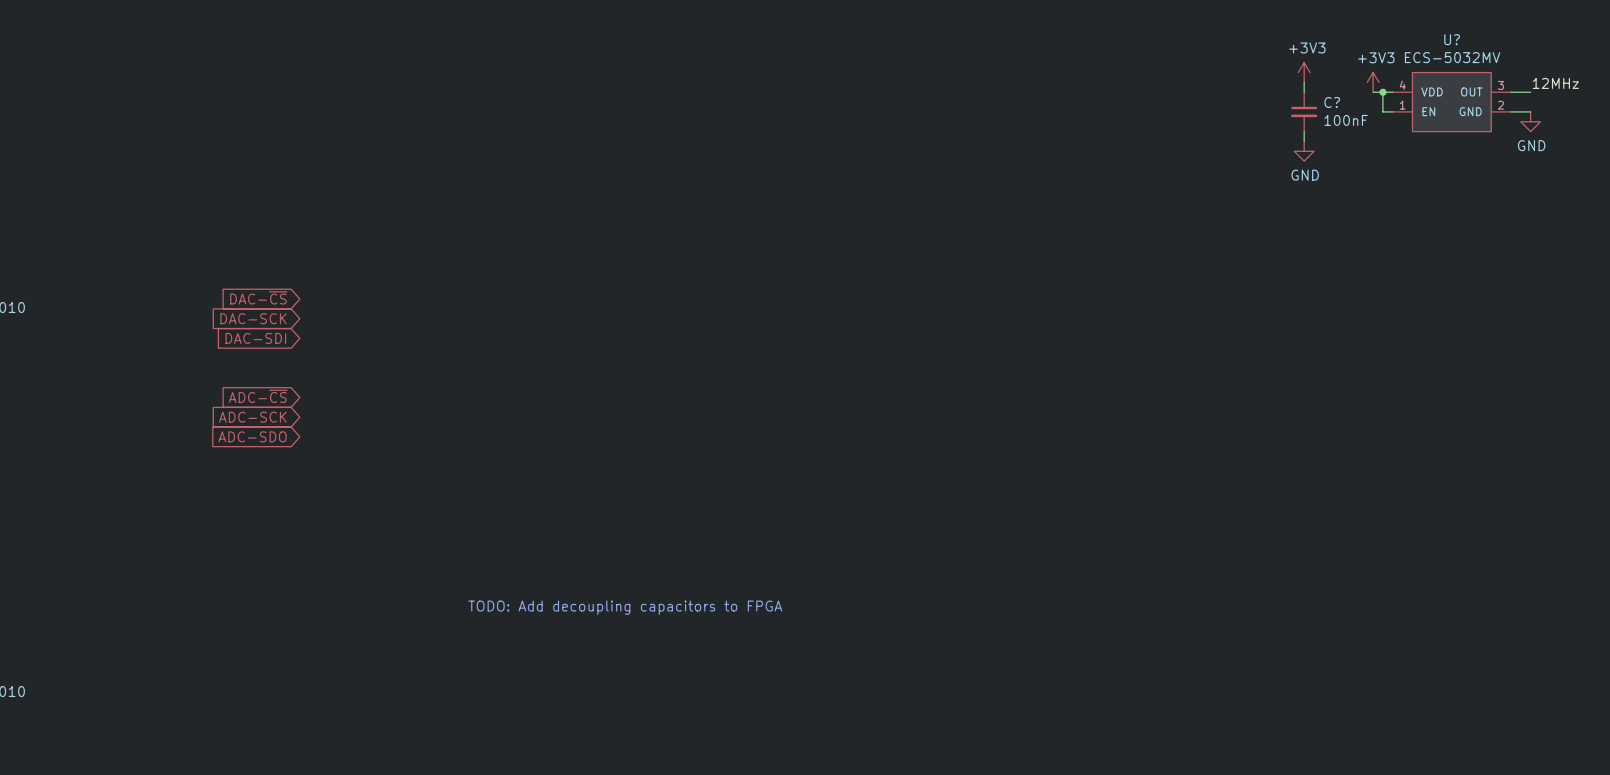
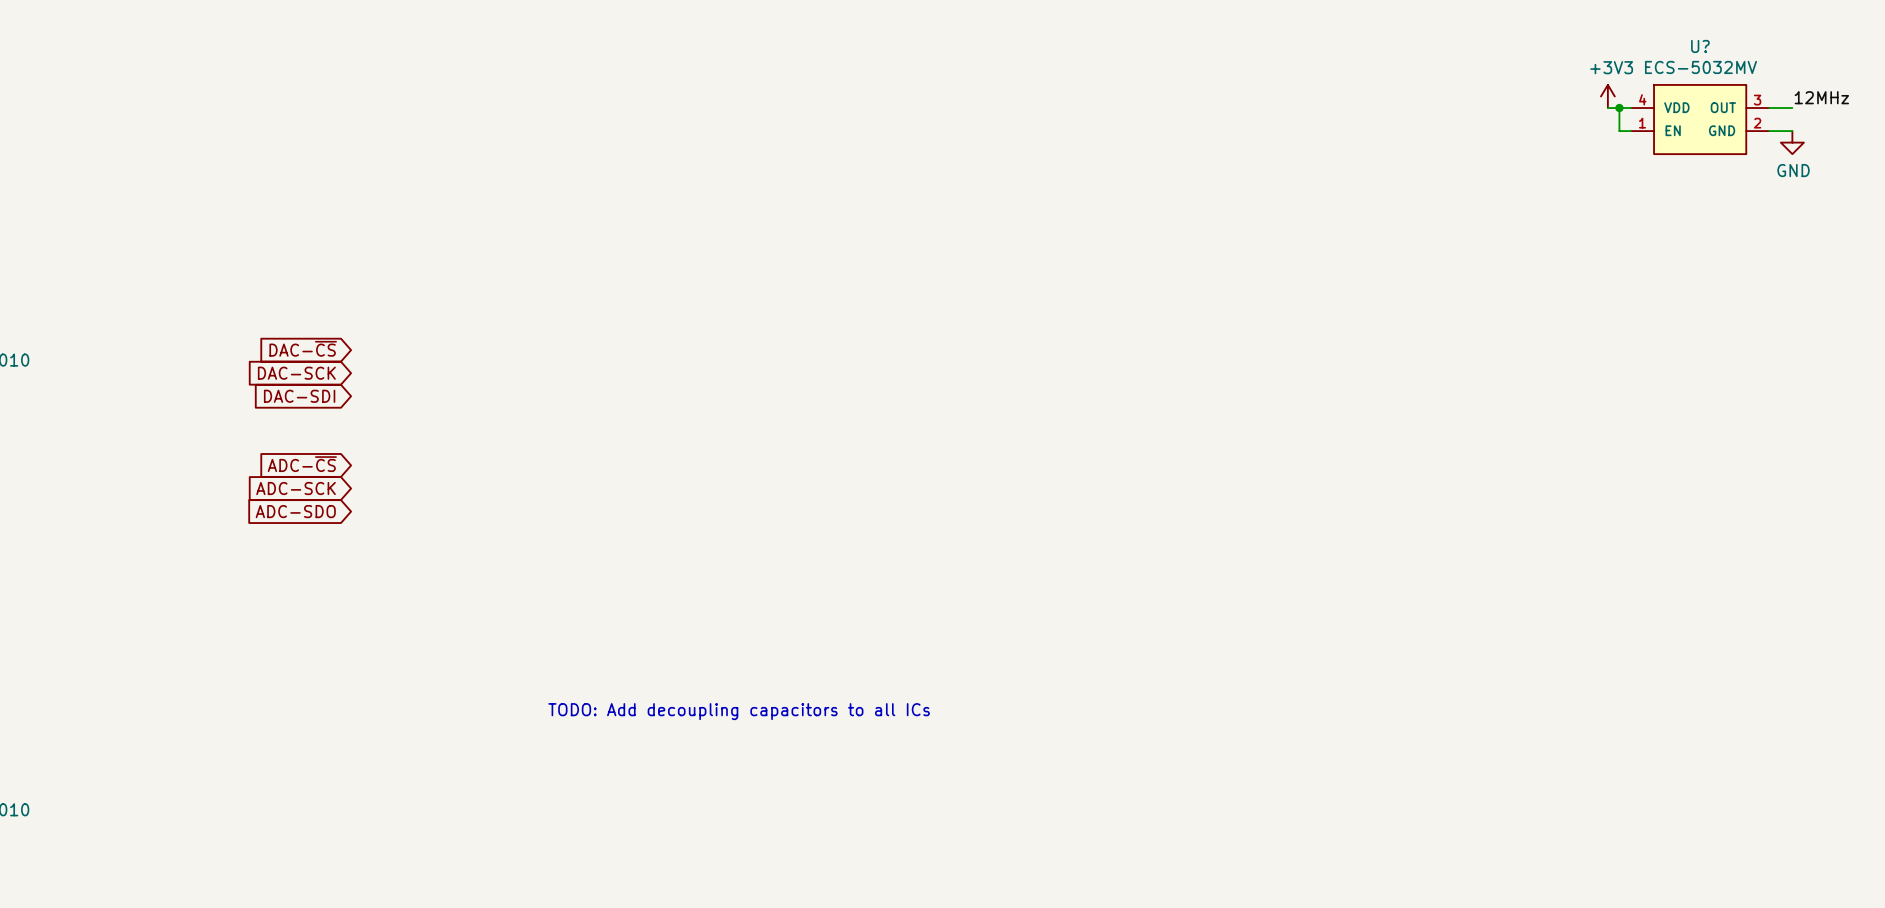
power symbol: +3V3 (1304, 72) -> none
wire: (1304, 82) (1304, 92) -> none
C?: 100nF (1304, 111) -> none
wire: (1304, 131) (1304, 141) -> none
power symbol: GND (1304, 151) -> none
text: TODO: Add decoupling capacitors to FPGA (625, 607) -> TODO: Add decoupling capacitors to all ICs (739, 711)

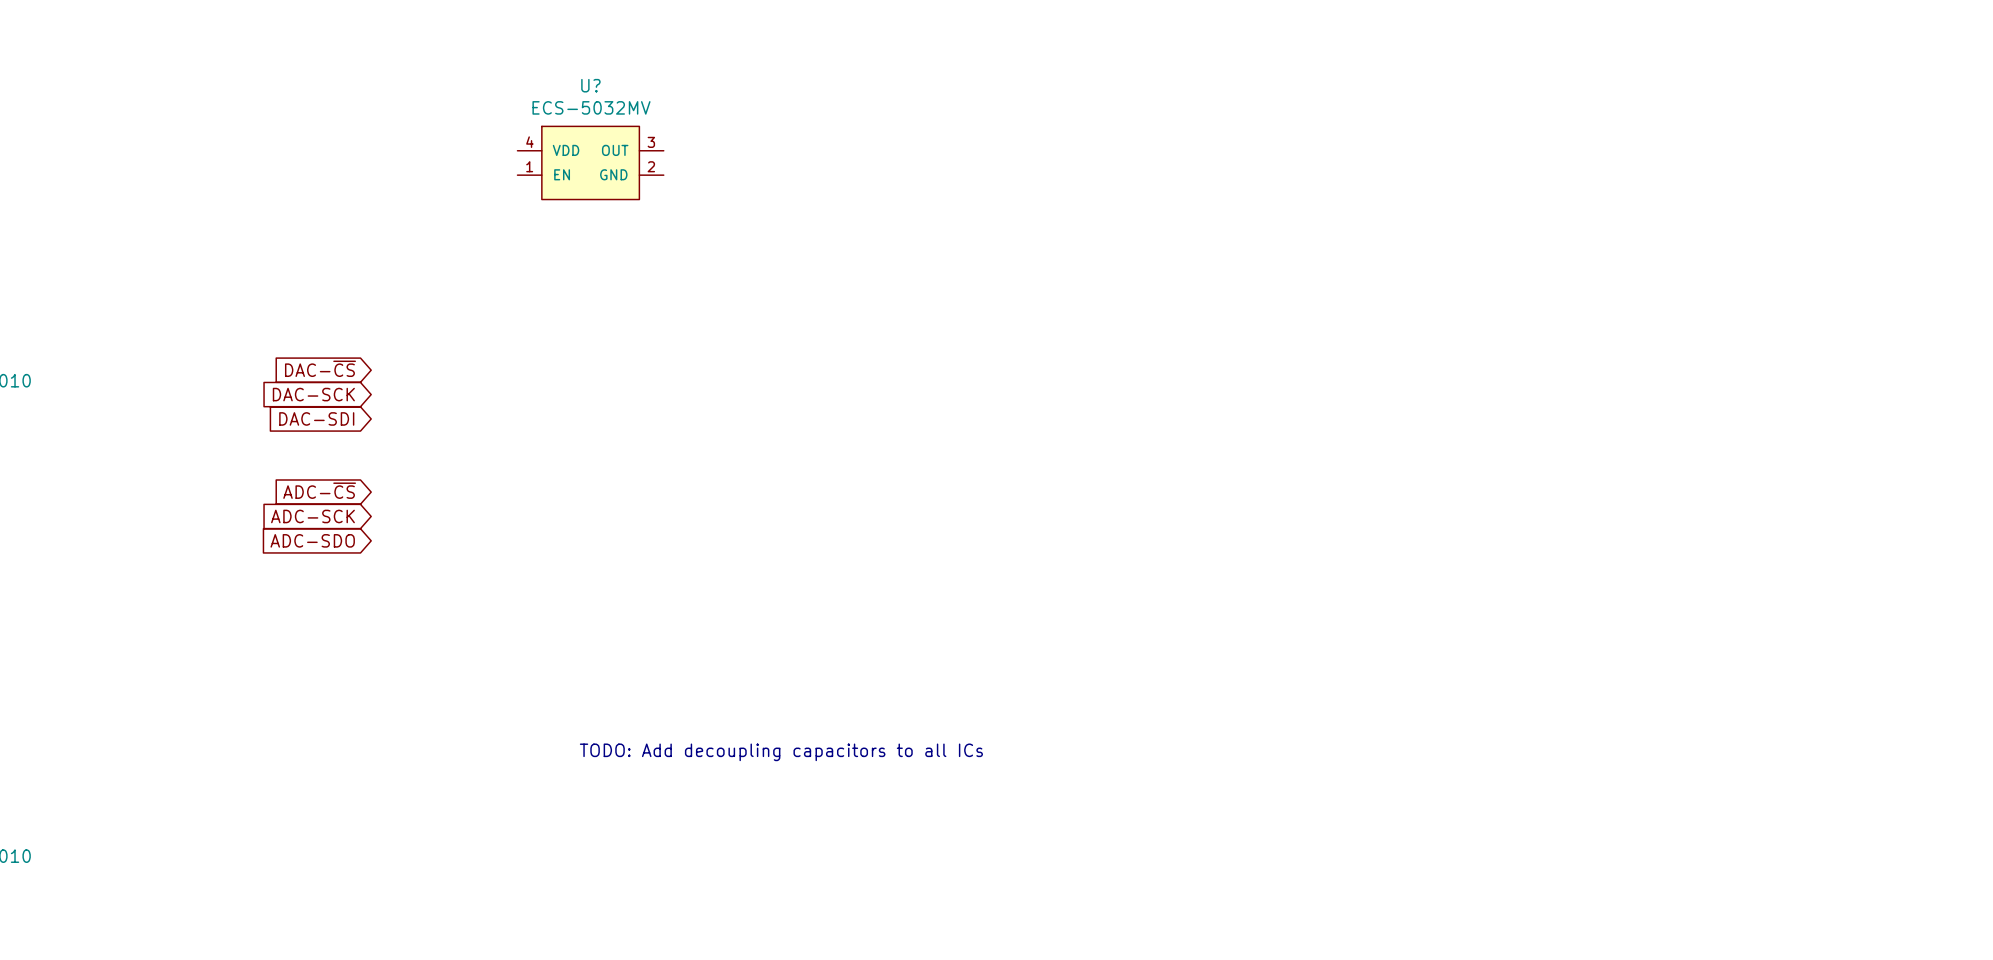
power symbol: +3V3 (1607, 96) -> none
label: 12MHz (1821, 97) -> none
wire: (1607, 108) (1630, 108) -> none
wire: (1619, 108) (1619, 131) (1630, 131) -> none
junction: (1619, 108) -> none
wire: (1769, 108) (1792, 108) -> none
U?: ECS-5032MV (1700, 119) -> none
wire: (1769, 131) (1792, 131) -> none
power symbol: GND (1792, 142) -> none
U?: none -> ECS-5032MV (590, 162)

